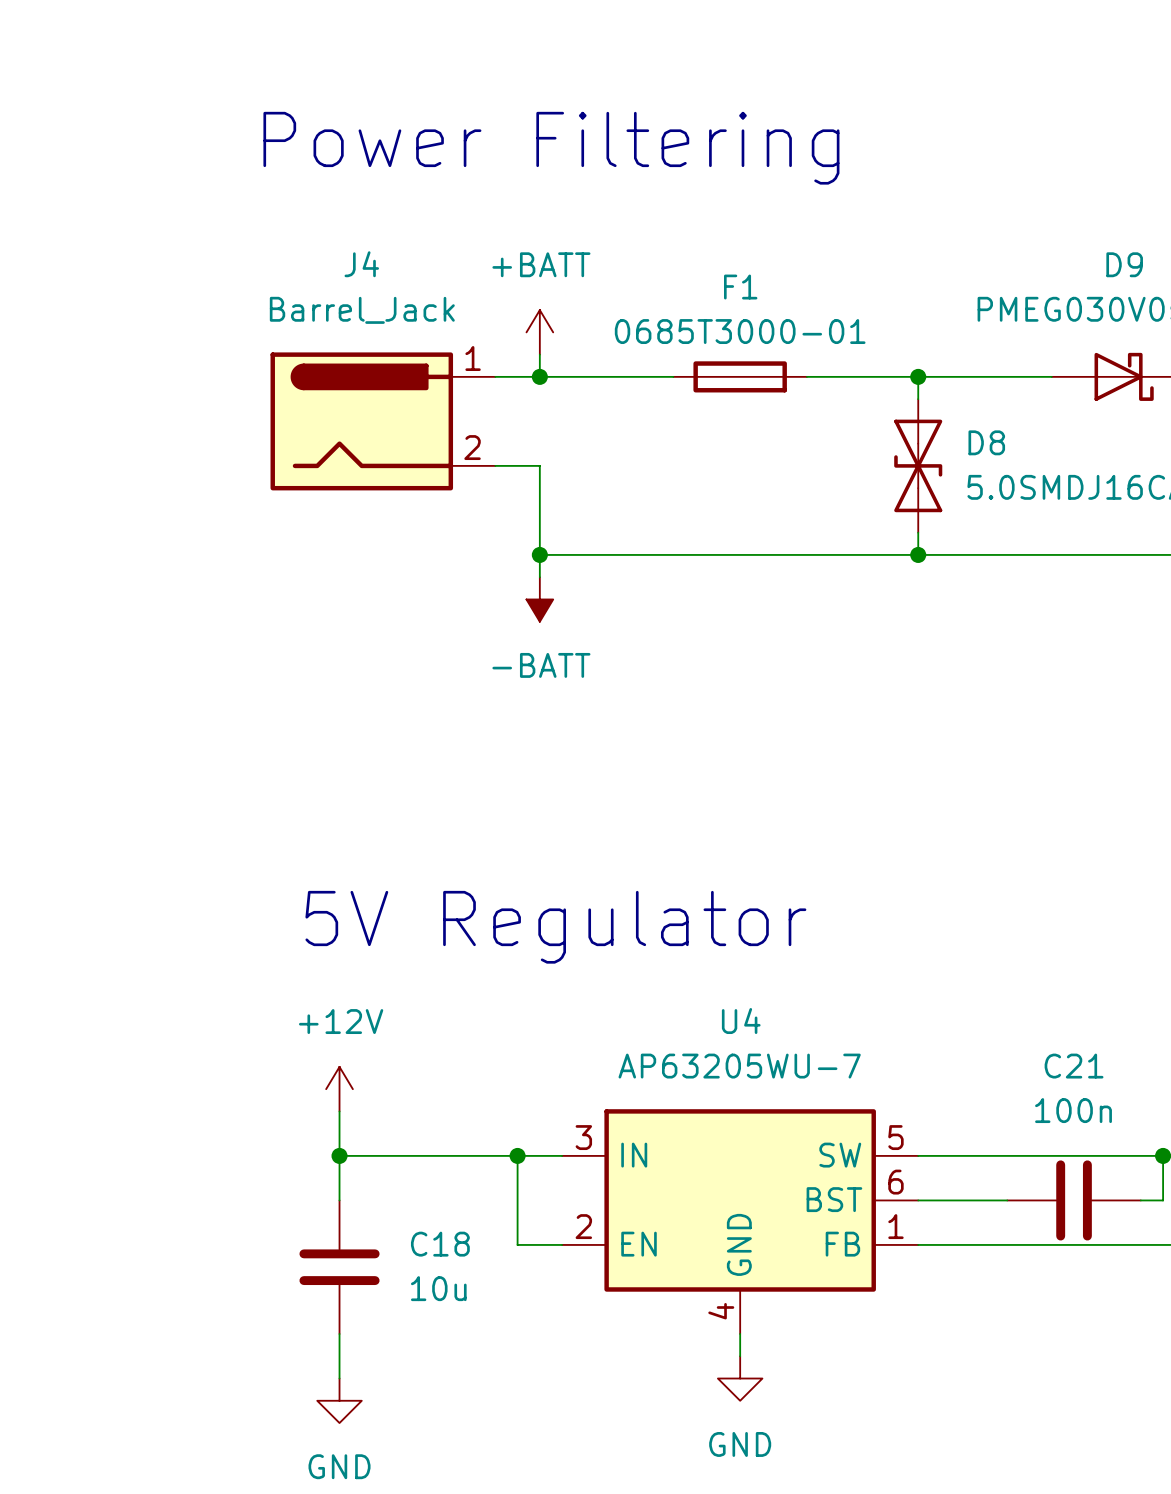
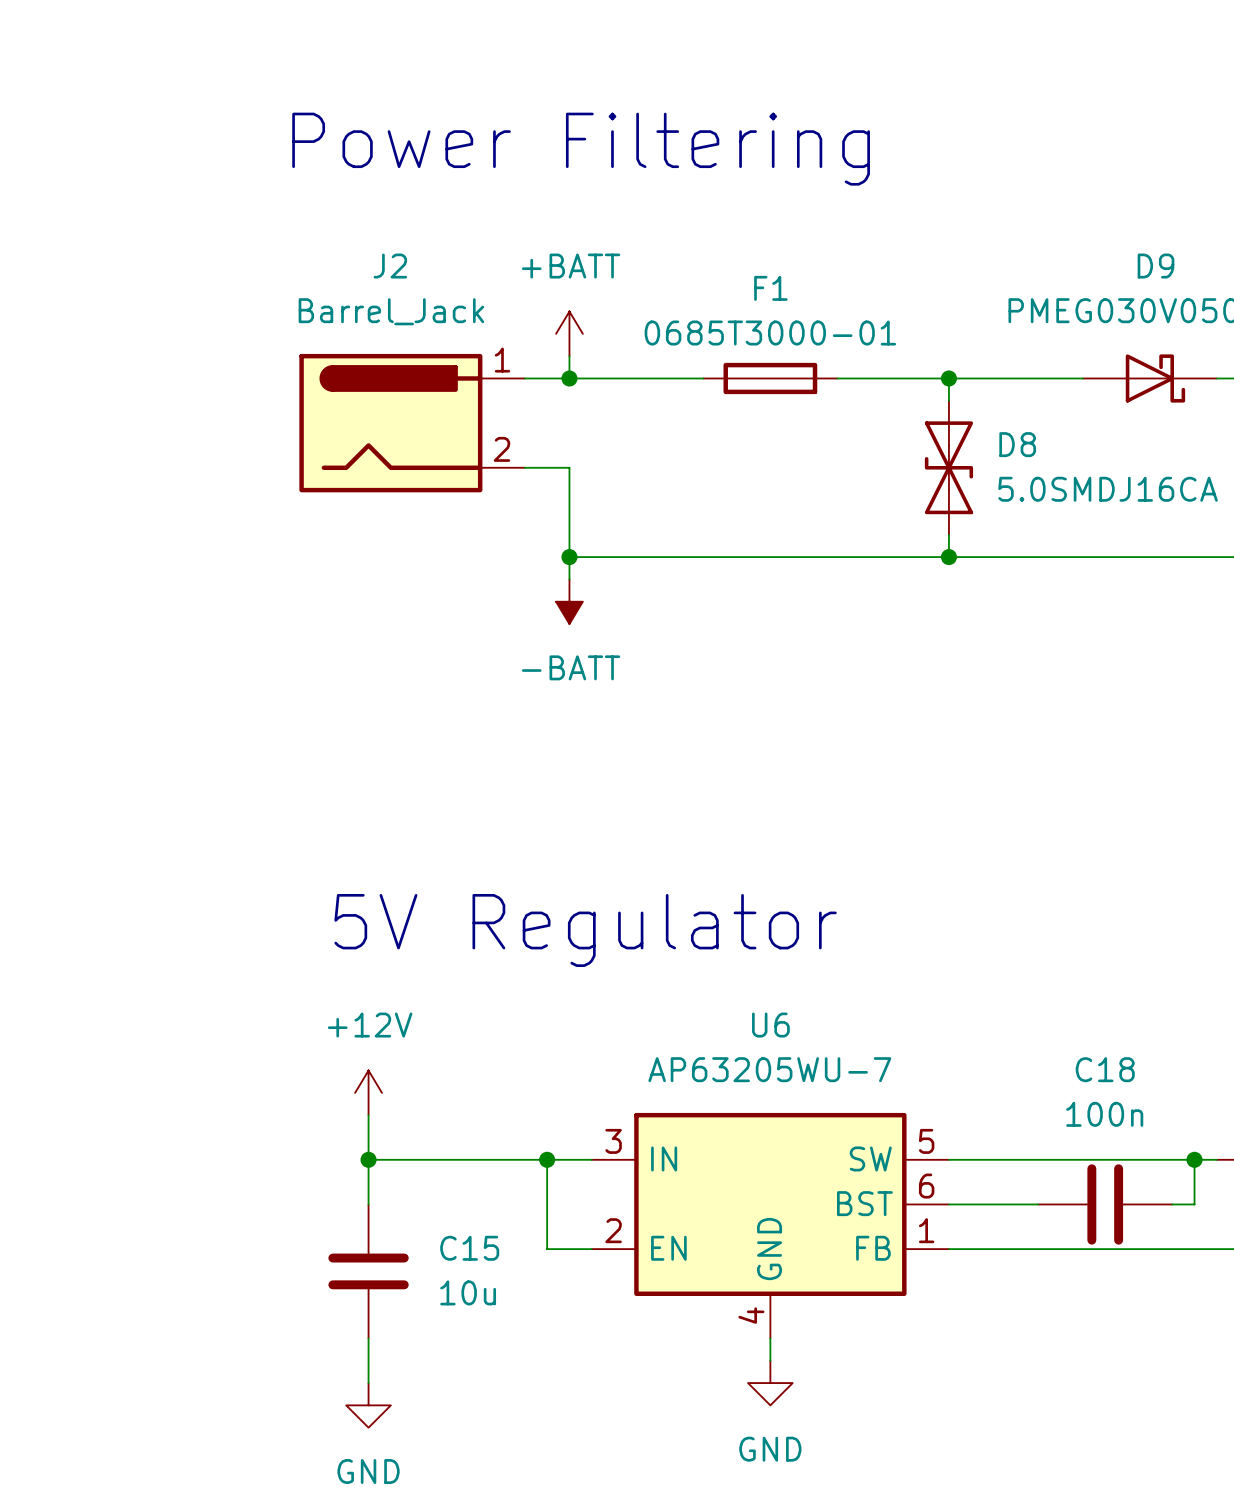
J4 name: J4 (361, 264) -> J2 (390, 266)
U4 name: U4 (741, 1021) -> U6 (770, 1025)
C21 name: C21 (1074, 1066) -> C18 (1105, 1069)
C18 name: C18 (440, 1244) -> C15 (469, 1248)

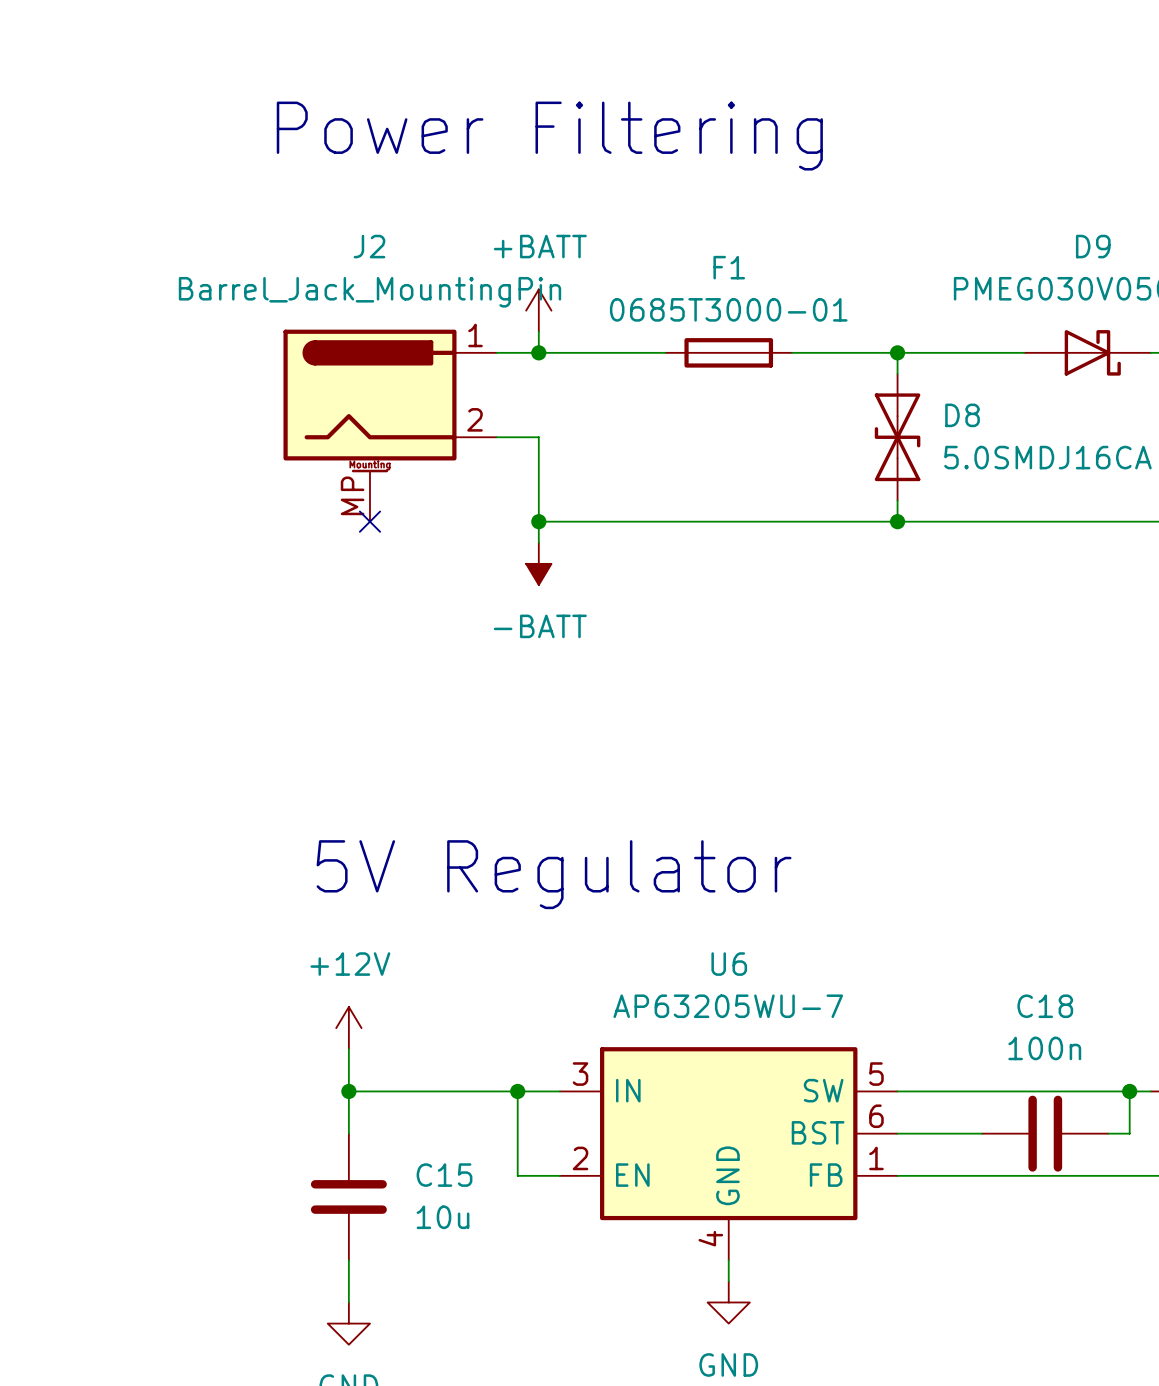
J2 value: Barrel_Jack (391, 311) -> Barrel_Jack_MountingPin (369, 292)
J2 symbol: [299, 353, 525, 493] -> [283, 329, 497, 522]
no-connect mark: none -> (369, 521)

